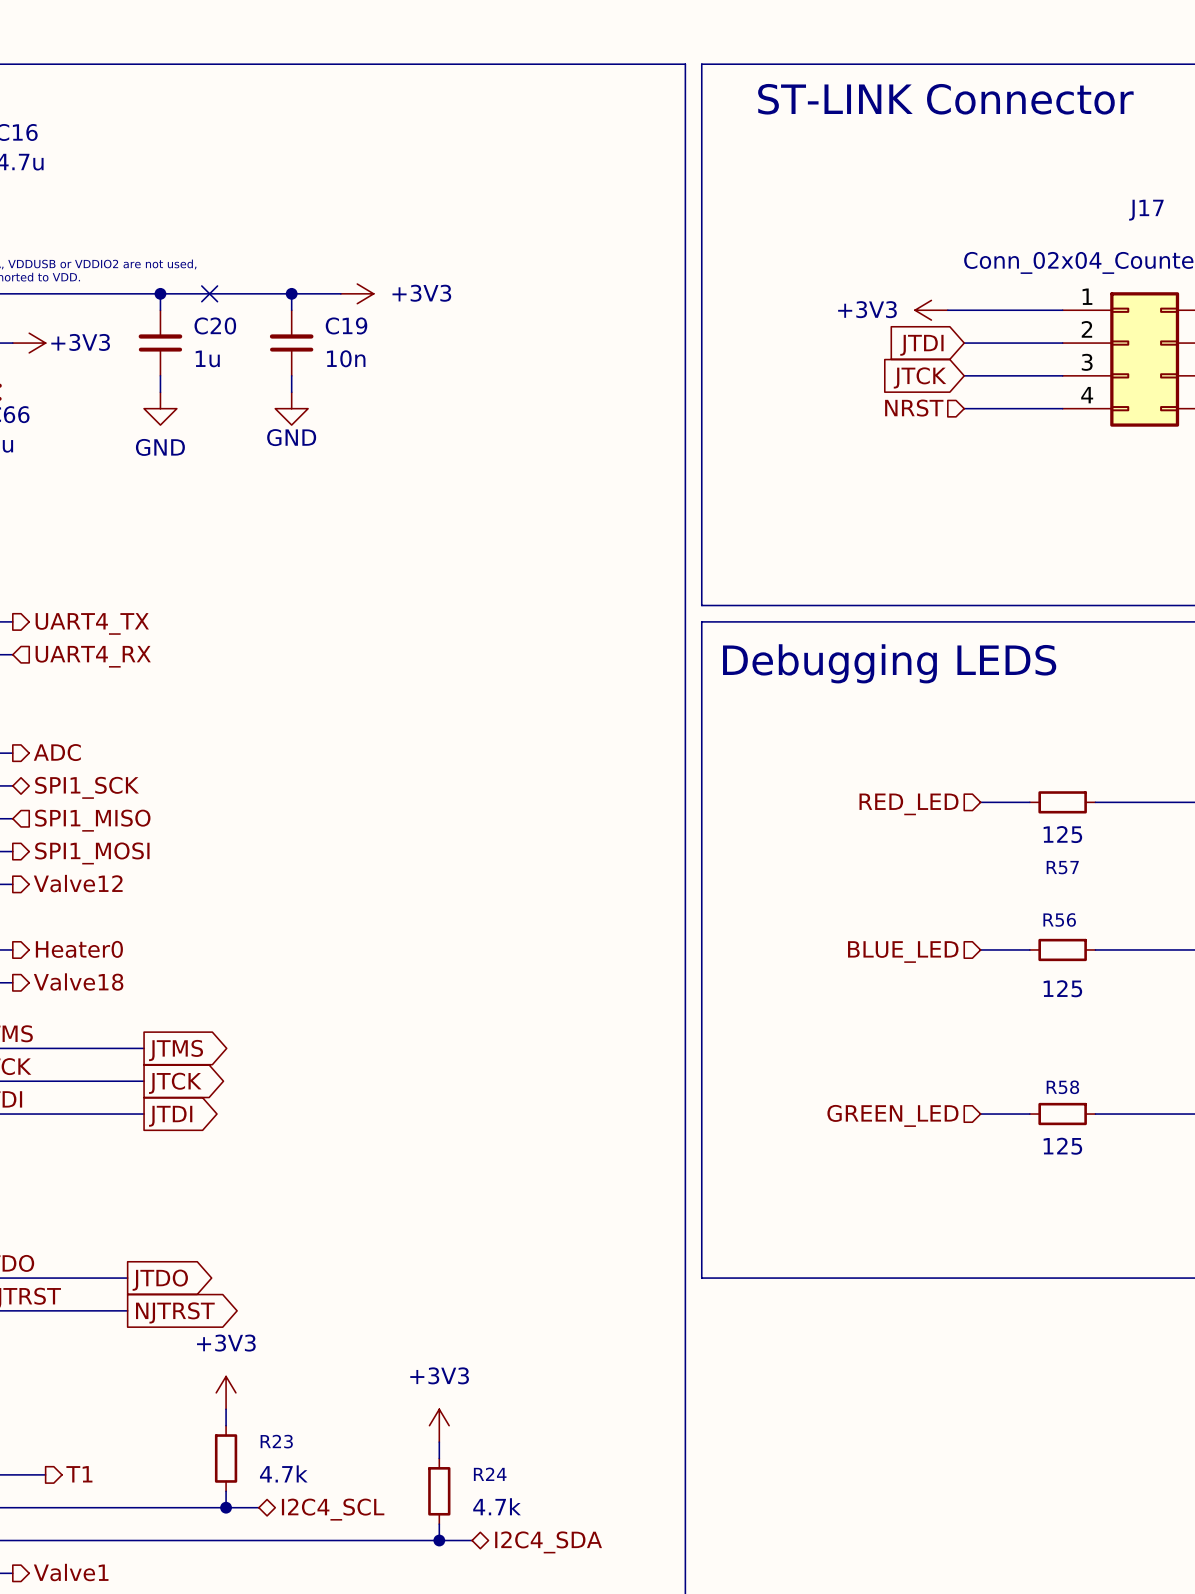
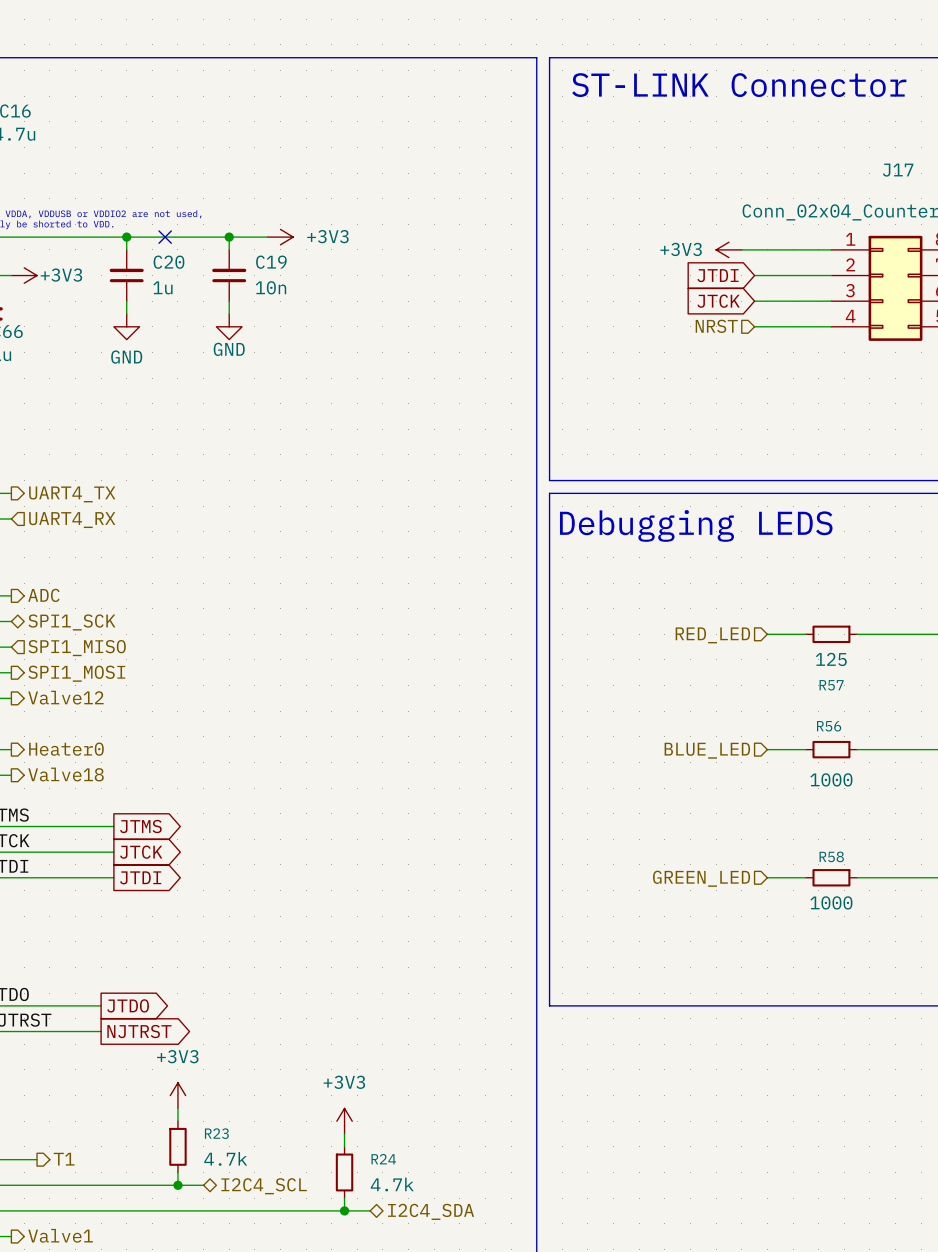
R56 value: 125 (1062, 988) -> 1000 (831, 779)
R58 value: 125 (1062, 1146) -> 1000 (831, 902)

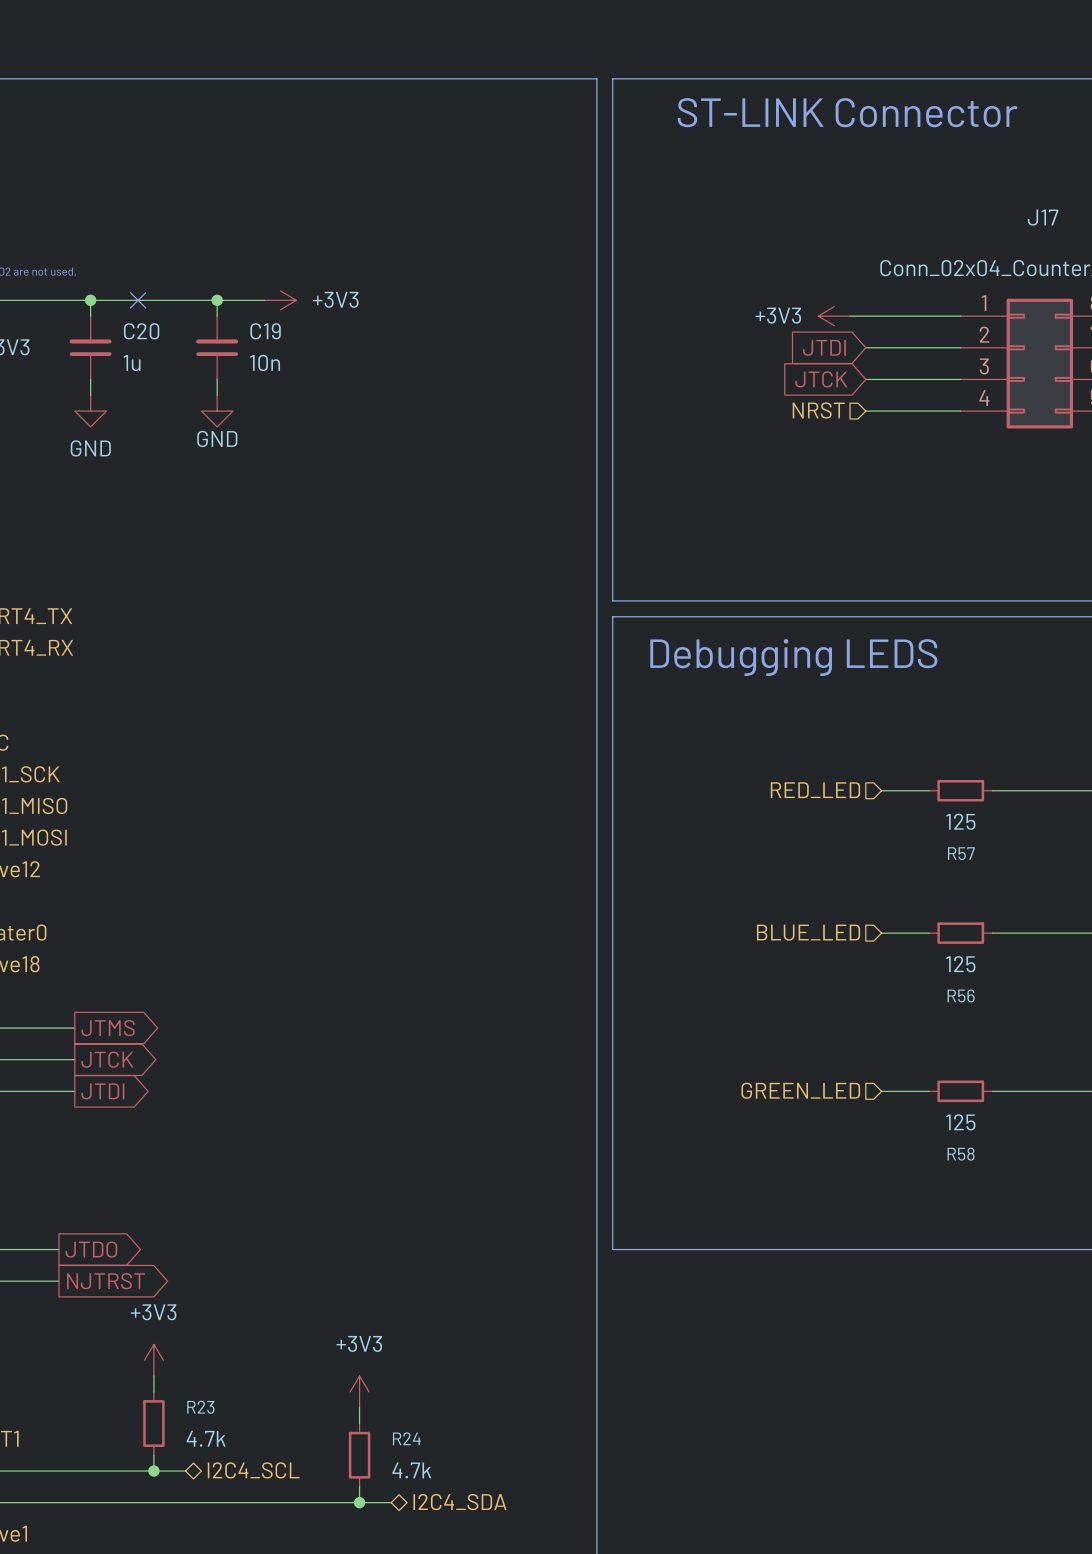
R56 name position: R56 (829, 726) -> R56 (961, 995)
R56 value: 1000 (831, 779) -> 125 (960, 964)
R58 name position: R58 (831, 856) -> R58 (961, 1154)
R58 value: 1000 (831, 902) -> 125 (960, 1122)

